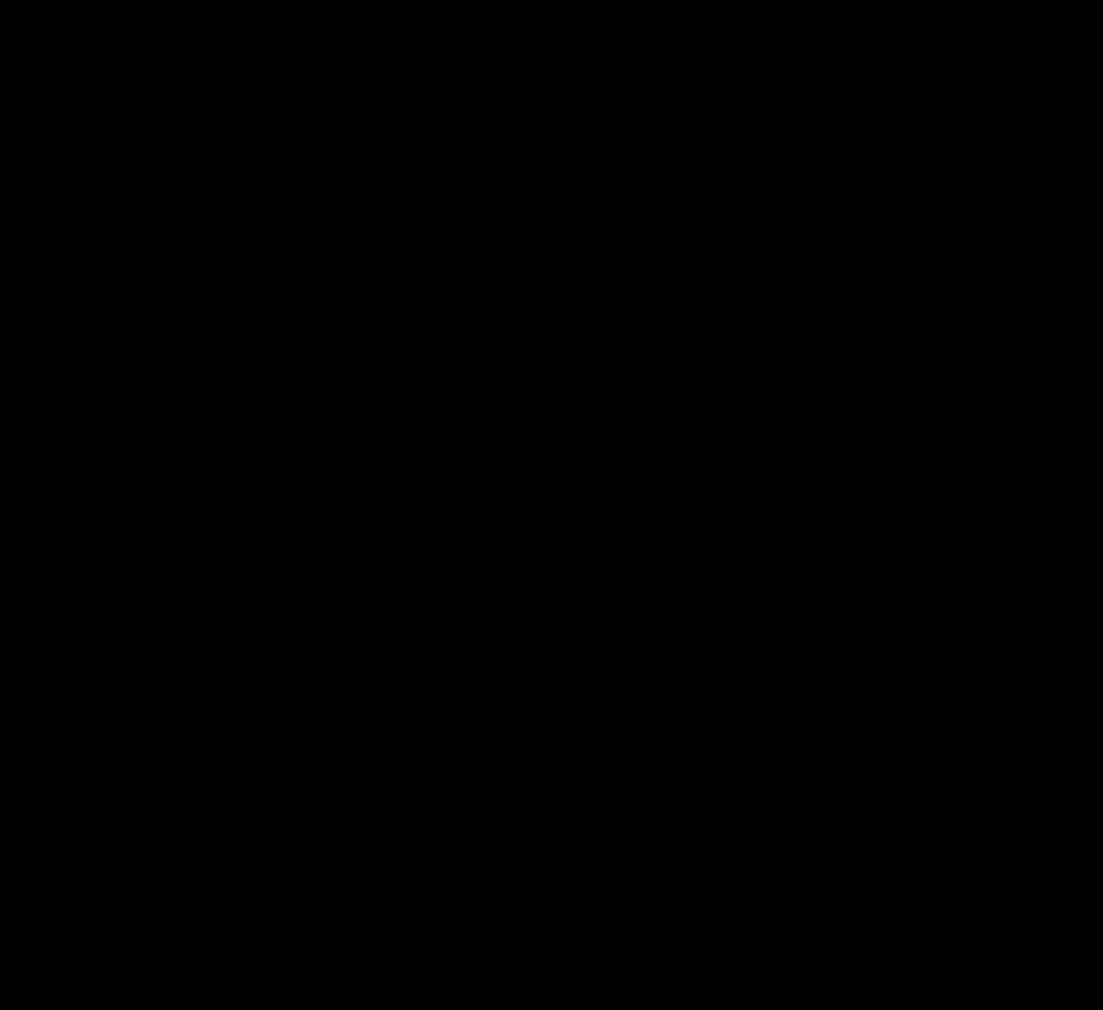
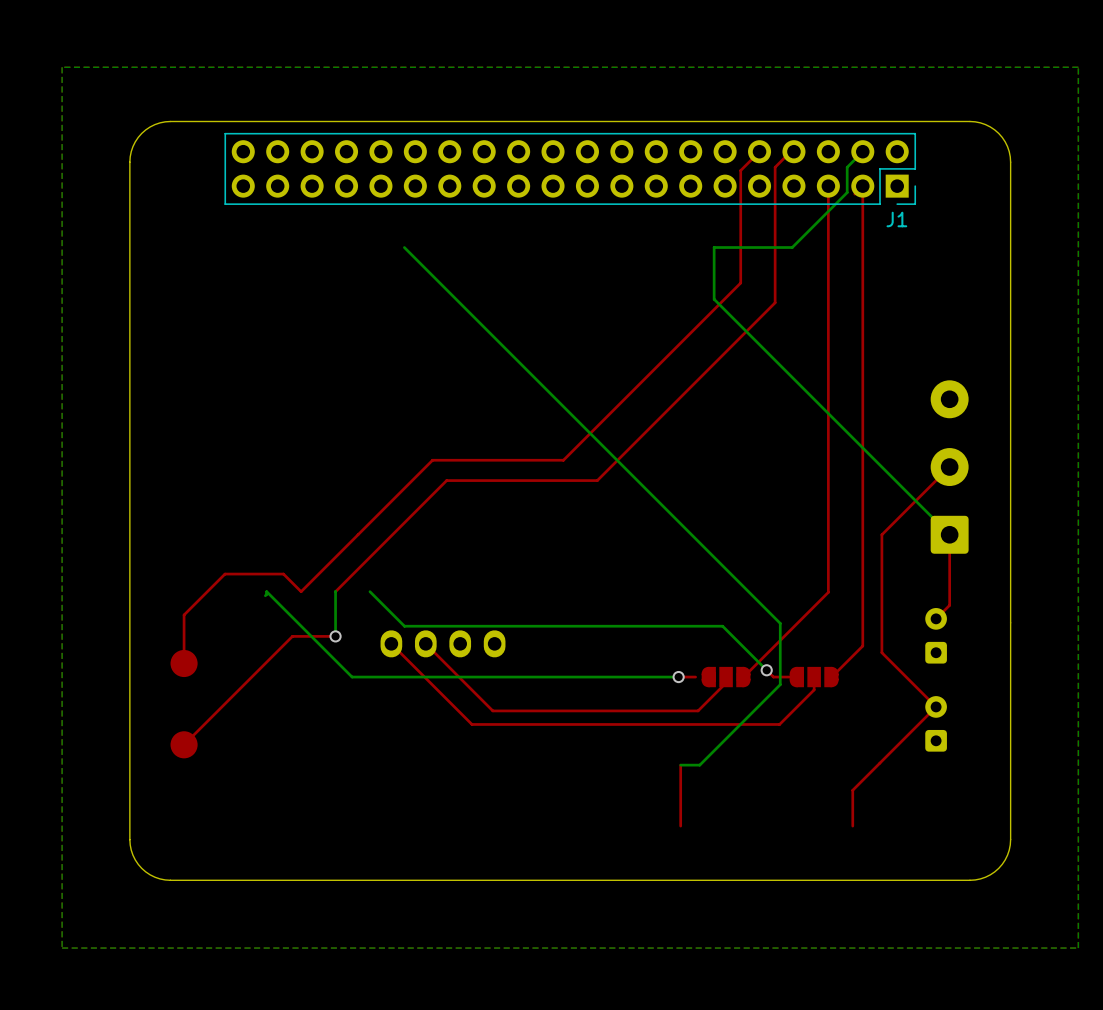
bottom zone outline: none -> (1078, 67) (62, 67) (62, 948) (1078, 948) (1078, 67)
board edge: none -> (969, 121) (170, 121) (154, 124) (141, 133) (132, 146) (129, 162) (129, 839) (132, 855) (141, 868) (154, 877) (170, 880) (969, 880) (985, 877) (998, 868) (1007, 855) (1010, 839) (1010, 162) (1007, 146) (998, 133) (985, 124) (969, 121)
top track: none -> (793, 148) (775, 167) (775, 302) (597, 480) (446, 480) (335, 591)
top track: none -> (759, 151) (740, 170) (740, 283) (563, 460) (432, 460) (301, 591) (283, 574) (225, 574) (184, 614) (184, 663)
bottom track: none -> (862, 151) (847, 167) (847, 192) (792, 247) (714, 247) (714, 299) (949, 534)
J1: none -> (570, 168)
top track: none -> (828, 186) (828, 592) (743, 677)
top track: none -> (854, 194) (862, 186) (862, 646) (831, 677)
bottom track: none -> (404, 247) (780, 623) (780, 684) (699, 765) (680, 765)
top track: none -> (949, 467) (881, 534) (881, 652) (936, 706) (852, 790) (852, 826)
part: none -> (949, 467)
top track: none -> (949, 534) (949, 605) (936, 618)
bottom track: none -> (335, 591) (335, 636)
bottom track: none -> (369, 591) (404, 626) (722, 626) (766, 670)
bottom track: none -> (265, 595) (266, 591) (352, 677) (675, 677)
part: none -> (936, 635)
top track: none -> (335, 636) (292, 636) (184, 744)
via: none -> (335, 636)
top track: none -> (391, 643) (472, 724) (779, 724) (814, 689) (814, 671)
top track: none -> (425, 643) (492, 710) (698, 710) (726, 682) (726, 677)
part: none -> (443, 643)
part: none -> (184, 663)
top track: none -> (766, 670) (773, 677) (796, 677)
via: none -> (766, 670)
via: none -> (678, 677)
top track: none -> (695, 677) (678, 677)
part: none -> (726, 677)
part: none -> (814, 677)
part: none -> (936, 723)
part: none -> (184, 744)
top track: none -> (680, 765) (680, 826)

